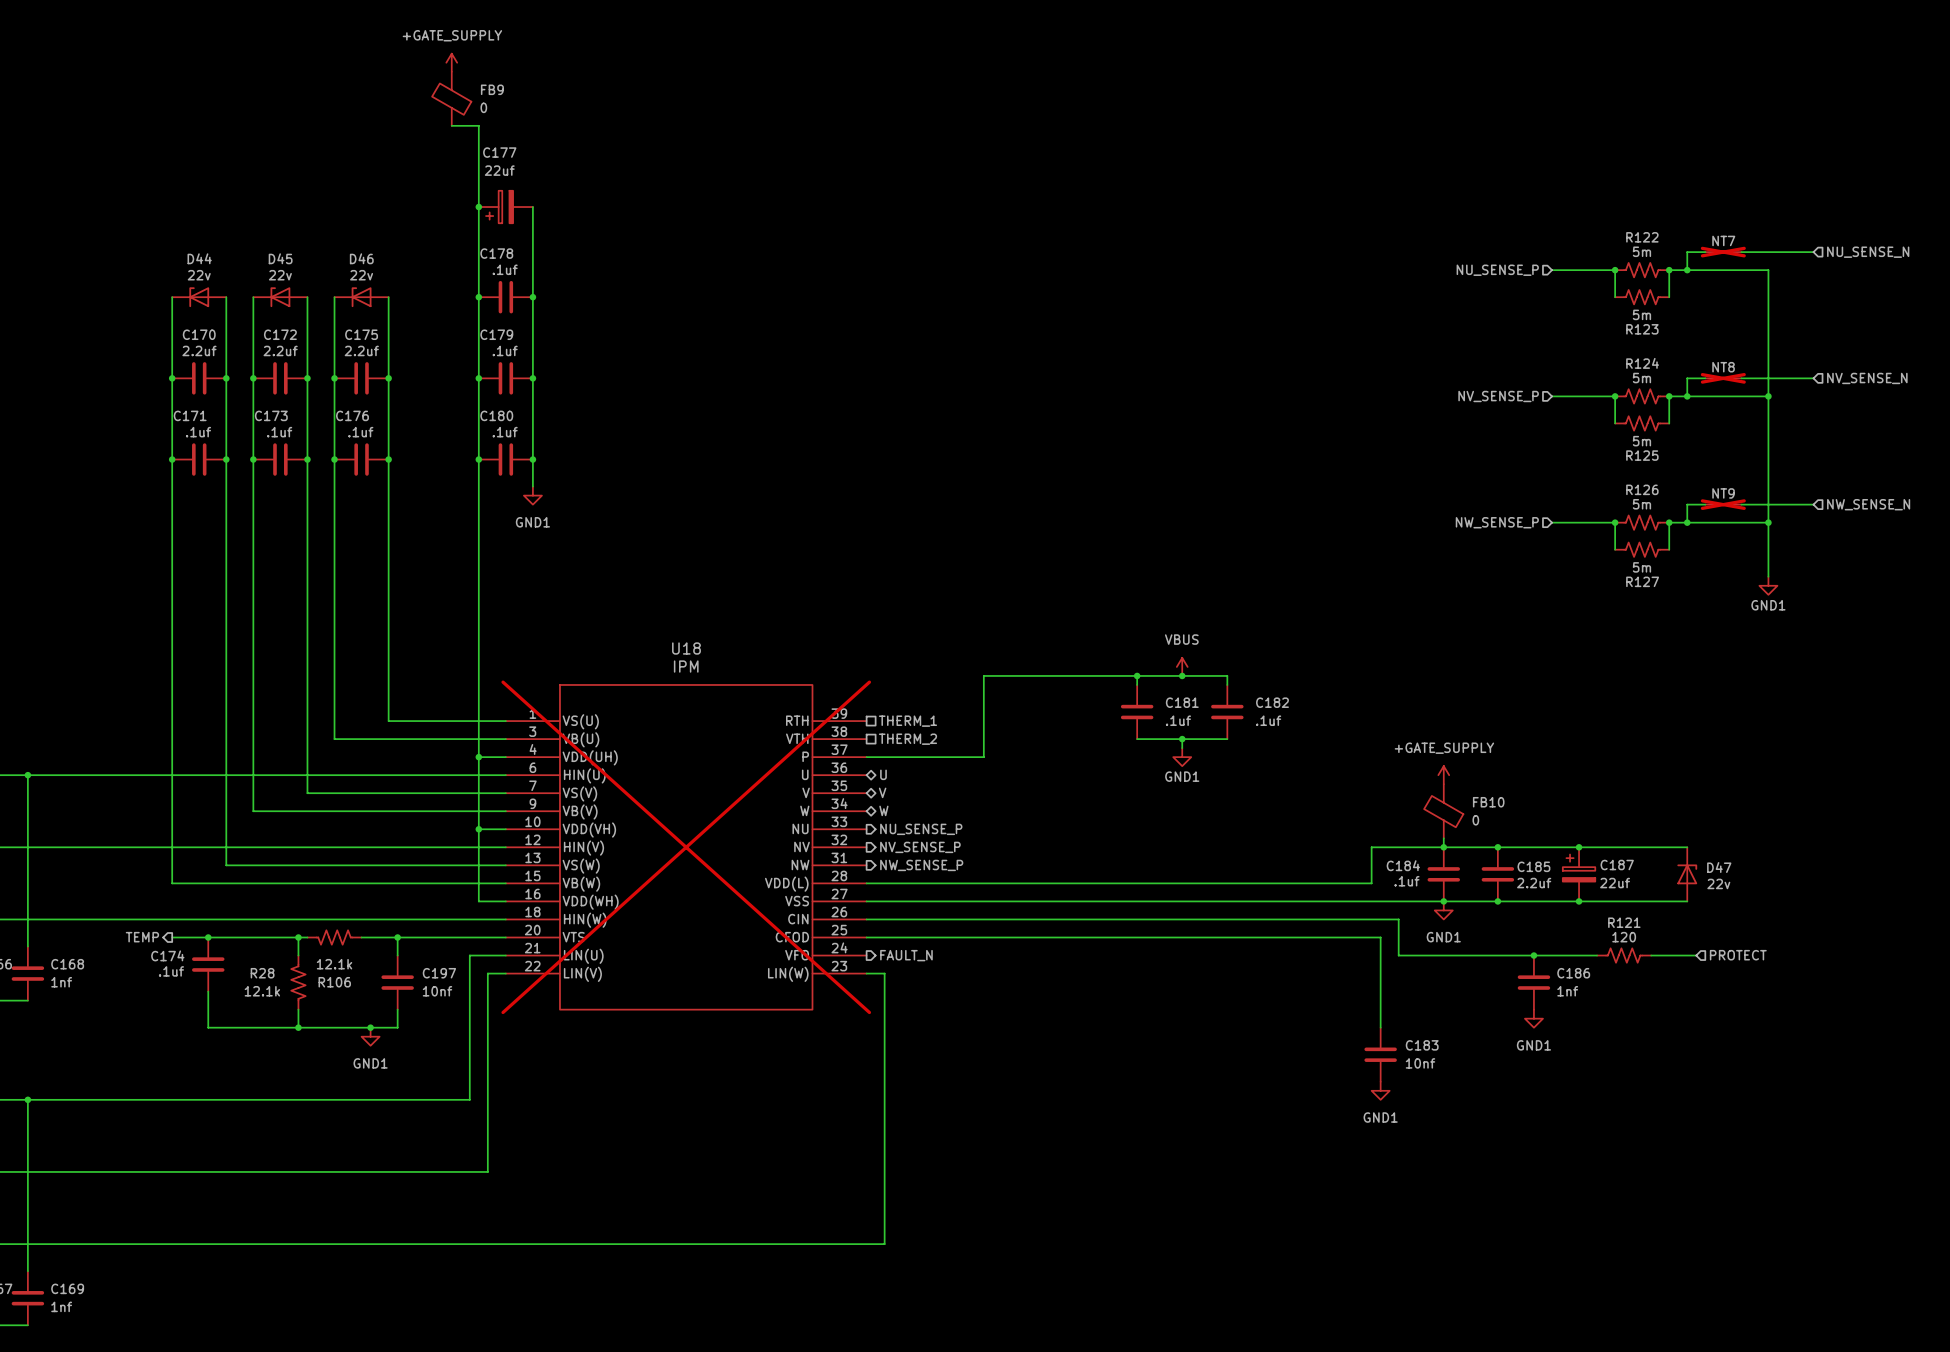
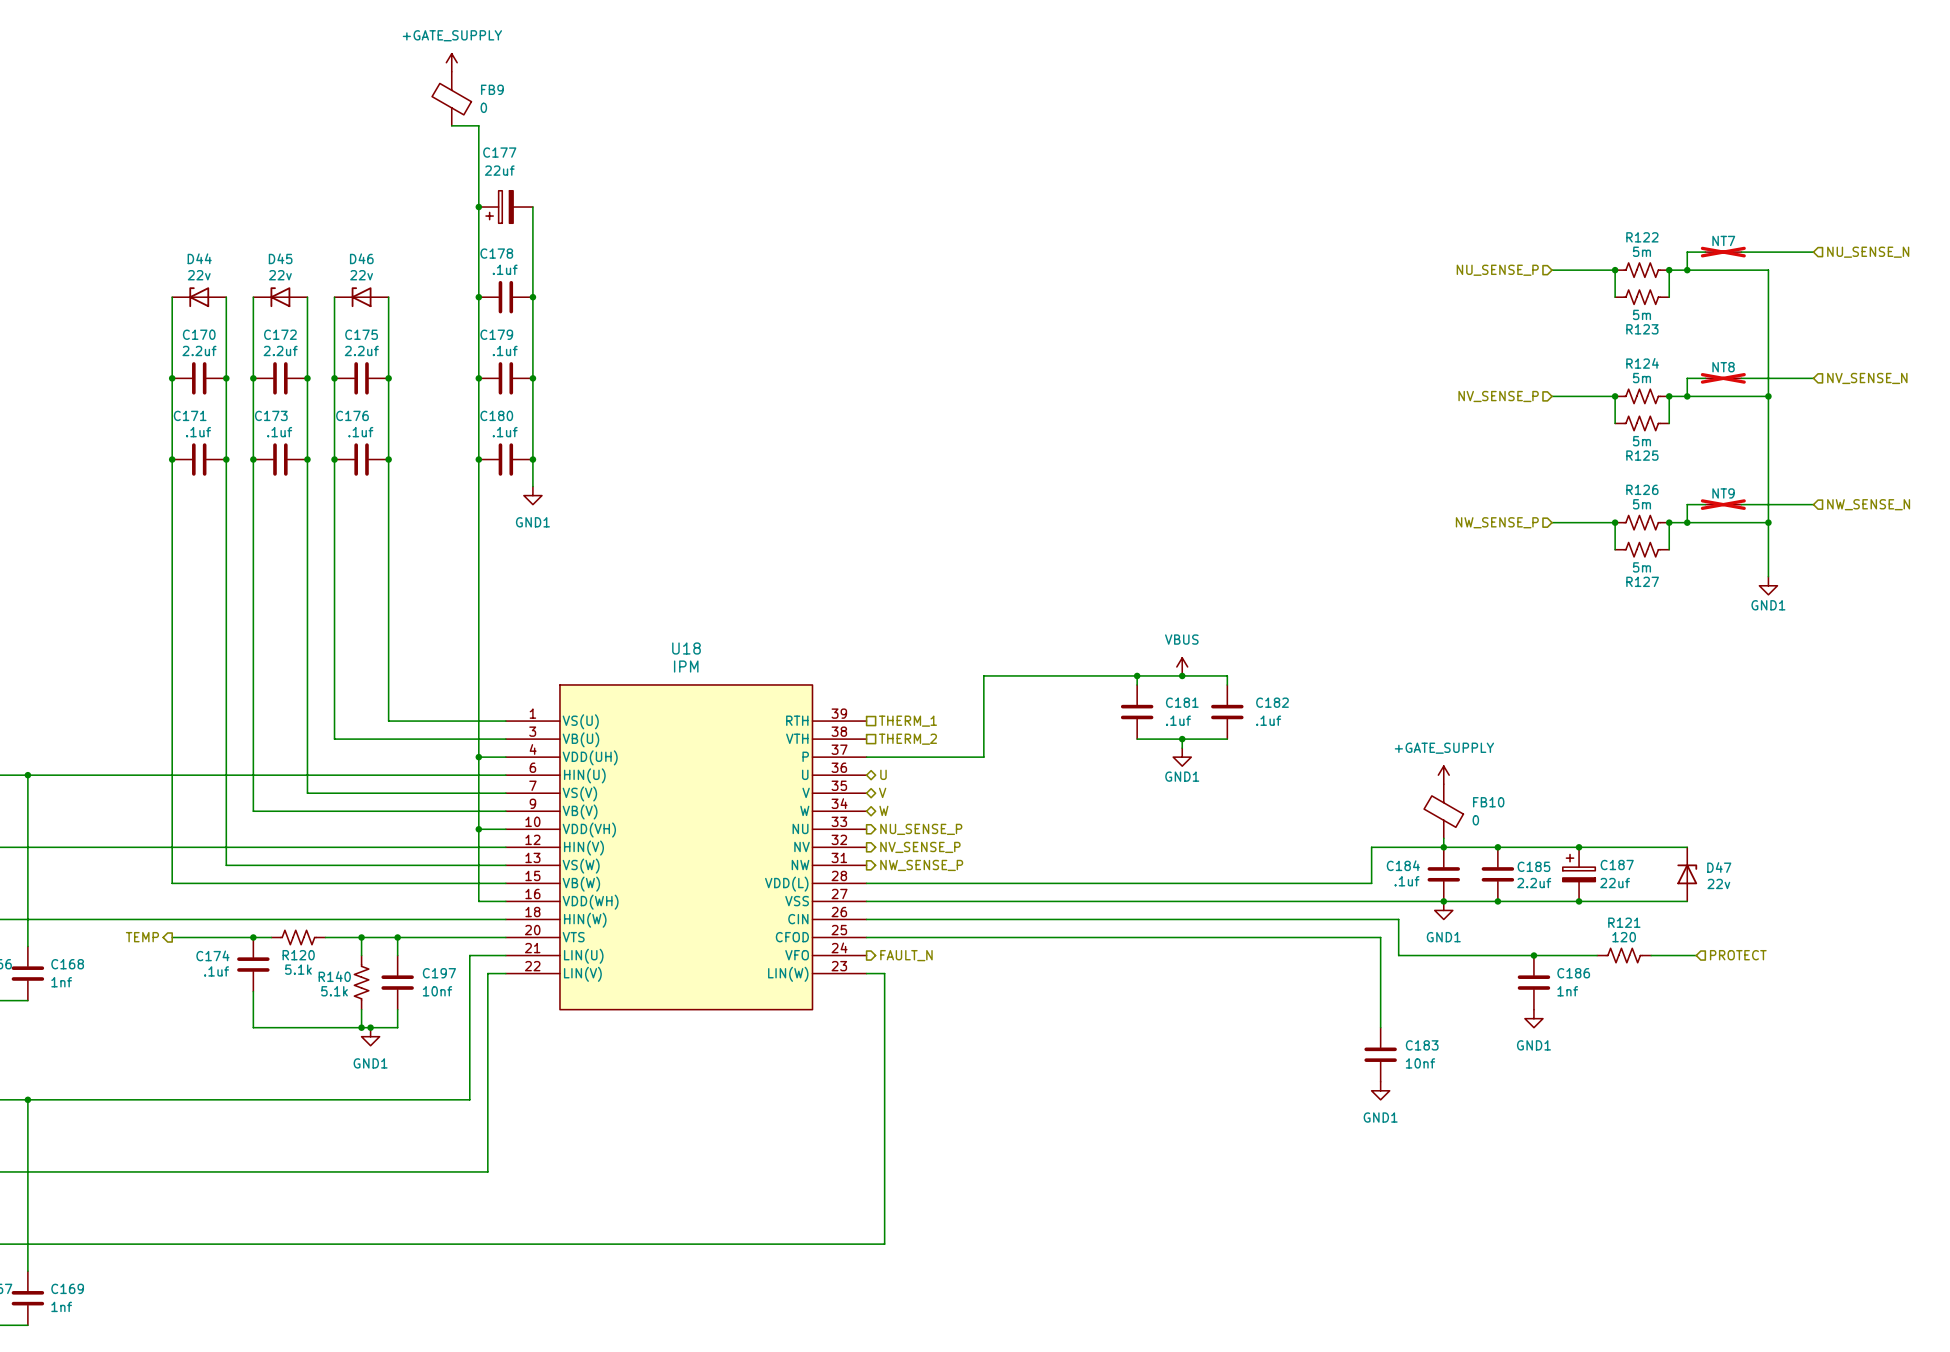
U18 do-not-place cross: (686, 847) -> none
junction: (208, 937) -> none
junction: none -> (253, 937)
wire: (298, 937) (298, 955) -> none
junction: (298, 937) -> none
R120: none -> 5.1k (298, 937)
wire: none -> (325, 937) (361, 937) (361, 955)
R106: 12.1k (334, 937) -> none
junction: none -> (361, 937)
C174 position: (208, 964) -> (253, 964)
R28: 12.1k (298, 982) -> none
R140: none -> 5.1k (361, 982)
wire: (208, 991) (208, 1027) (253, 1027) -> (253, 991) (253, 1027)
wire: (298, 1009) (298, 1027) -> (361, 1009) (361, 1027)
junction: (298, 1027) -> none
junction: none -> (361, 1027)

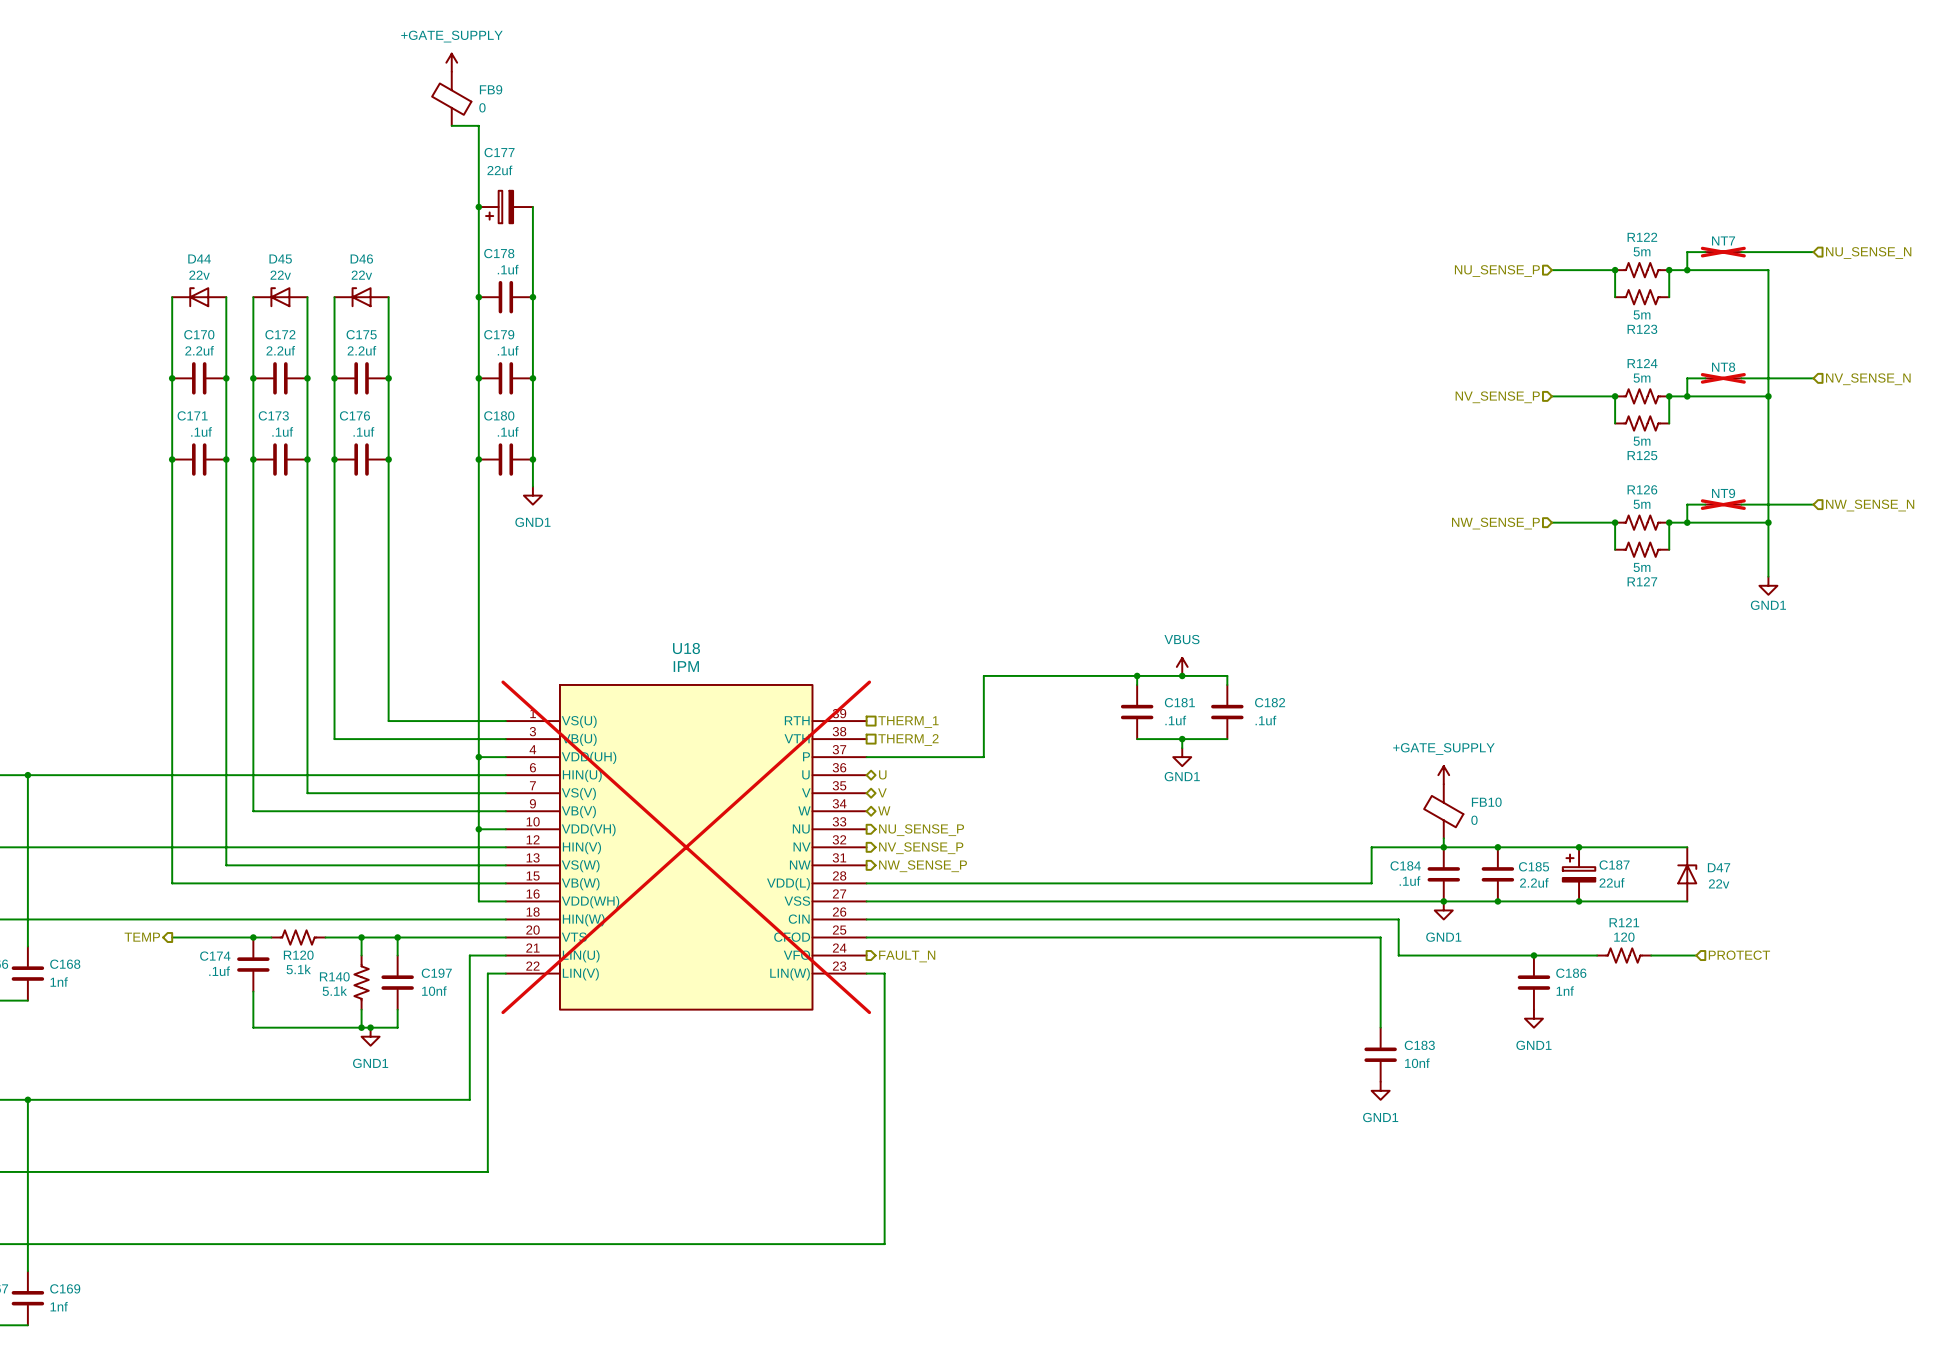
U18 do-not-place cross: none -> (686, 847)

